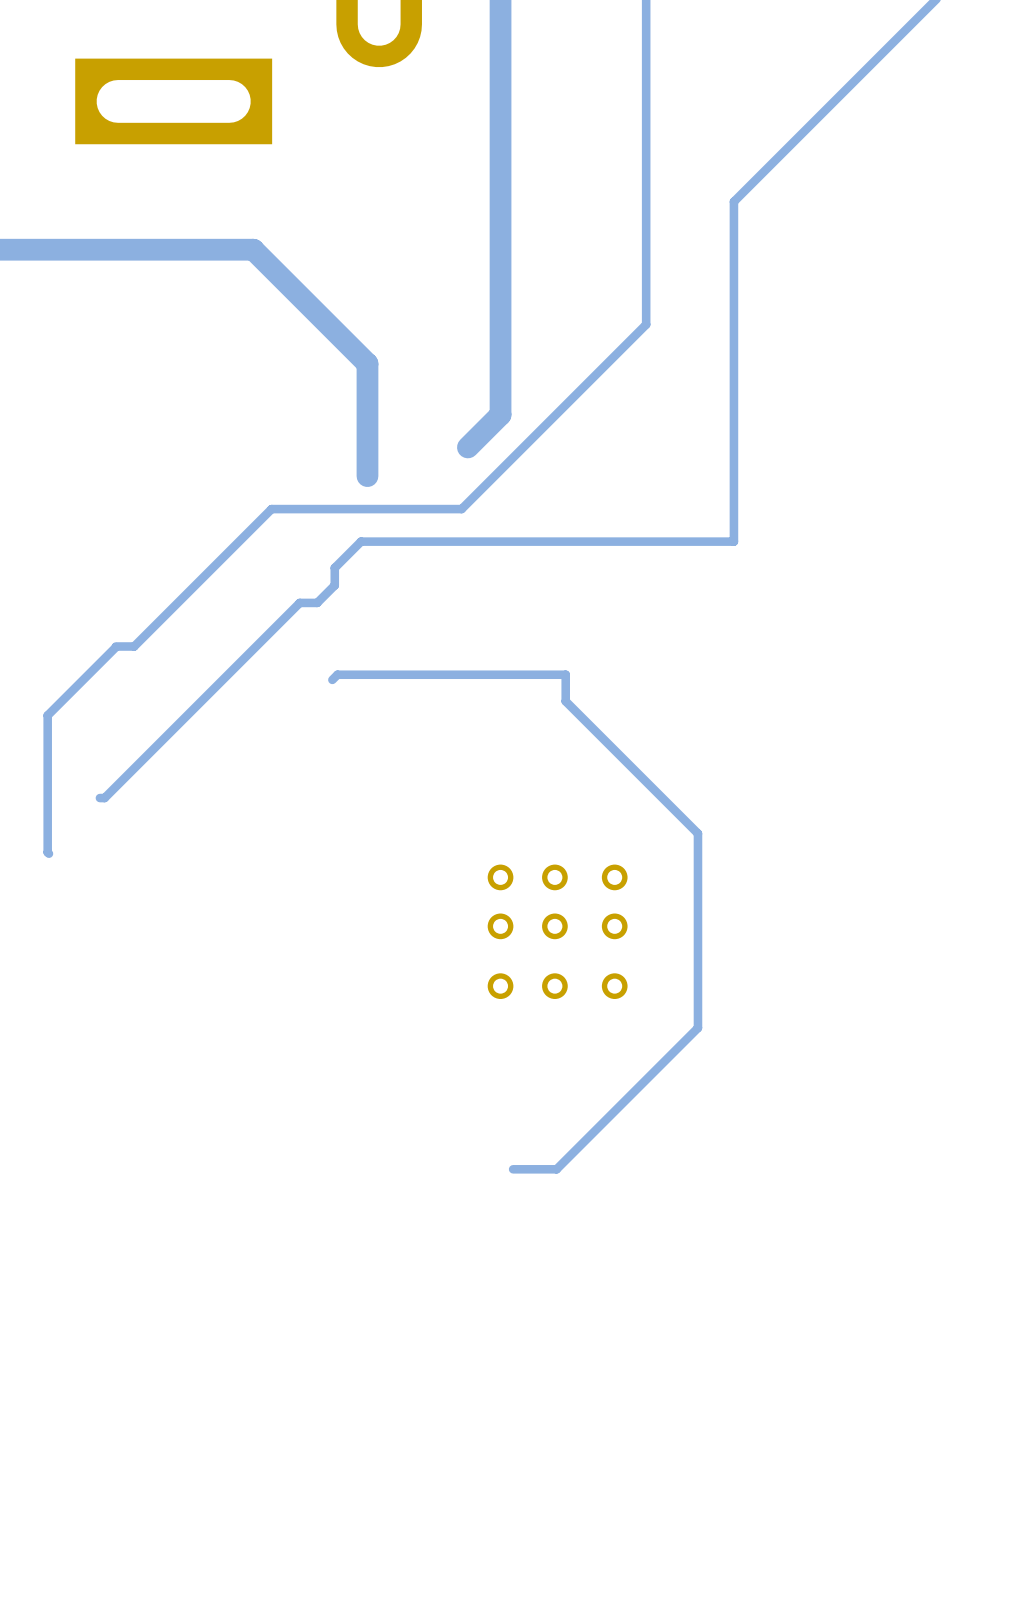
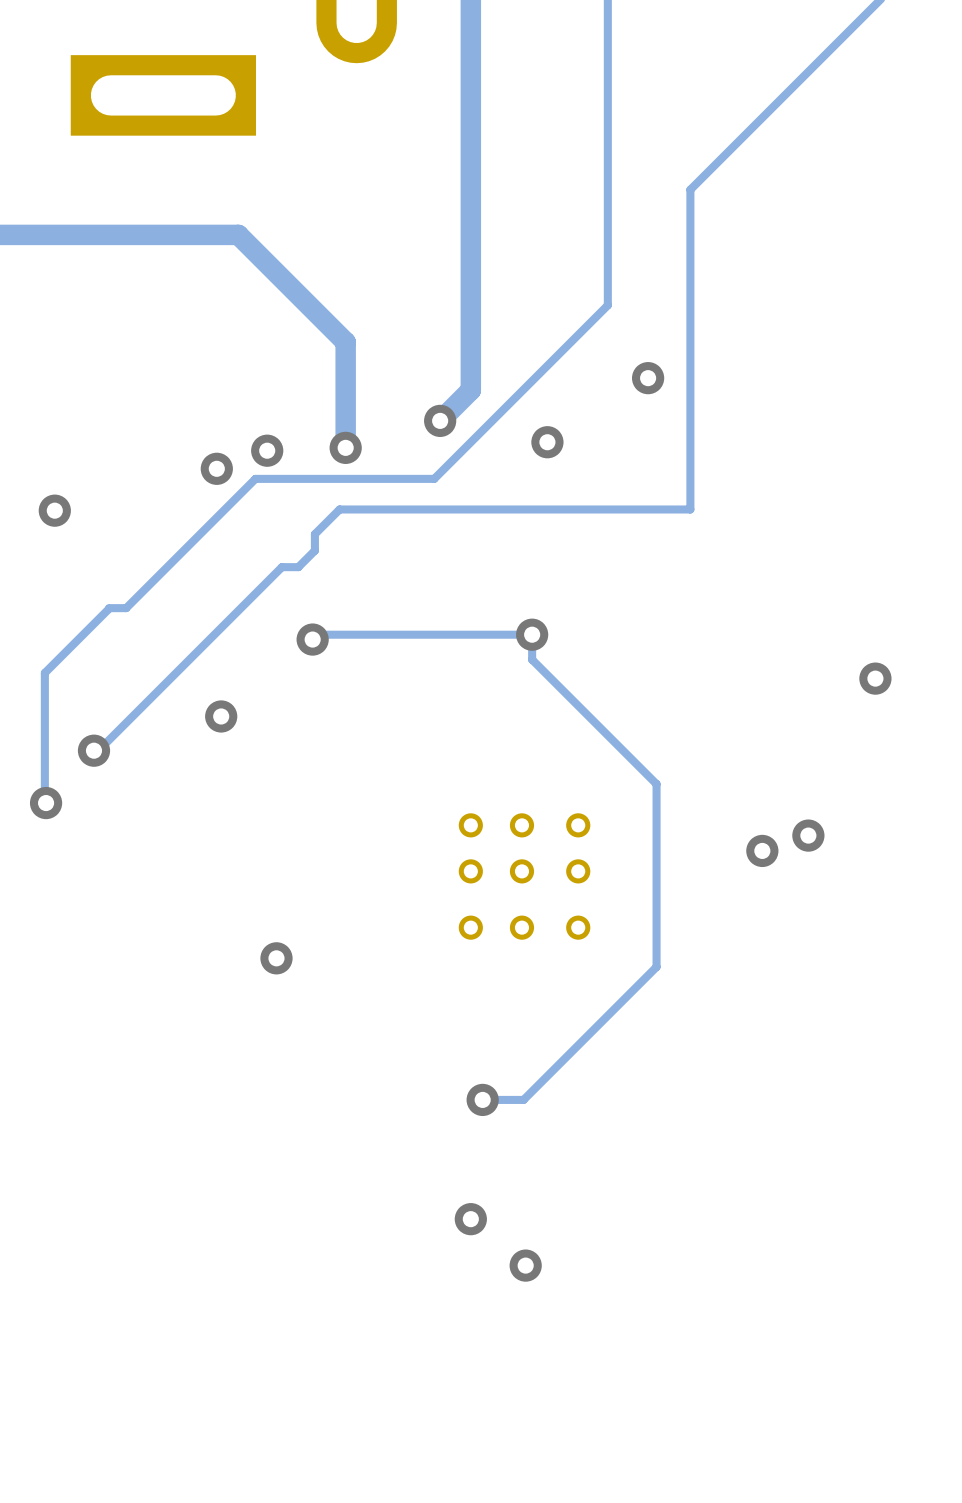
via: none -> (648, 378)
via: none -> (440, 420)
via: none -> (547, 442)
via: none -> (345, 447)
via: none -> (267, 450)
via: none -> (216, 468)
via: none -> (54, 510)
via: none -> (532, 634)
via: none -> (312, 639)
via: none -> (875, 678)
via: none -> (221, 716)
via: none -> (93, 750)
via: none -> (46, 803)
via: none -> (808, 835)
via: none -> (762, 850)
via: none -> (276, 958)
via: none -> (482, 1099)
via: none -> (470, 1219)
via: none -> (525, 1265)

